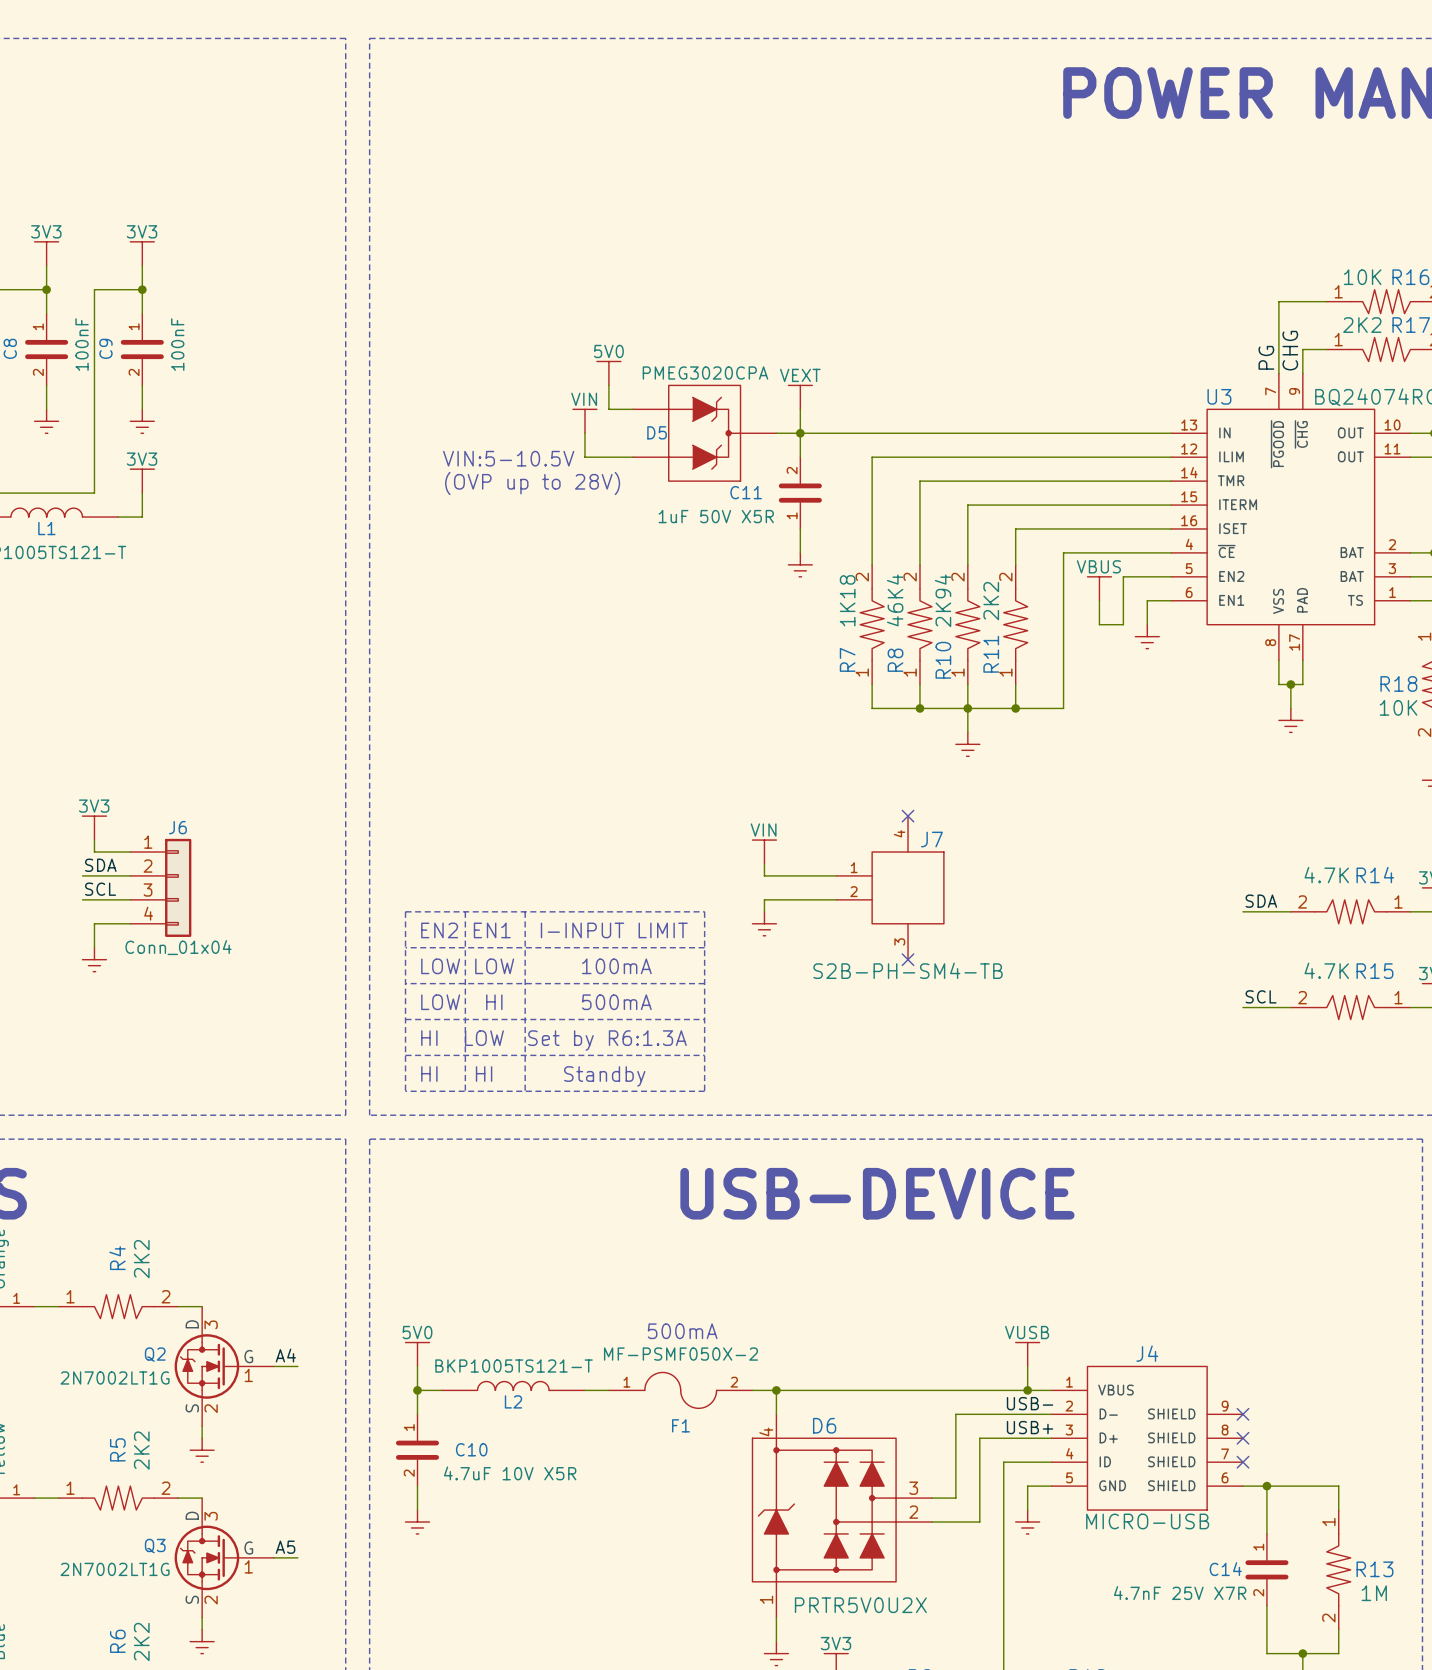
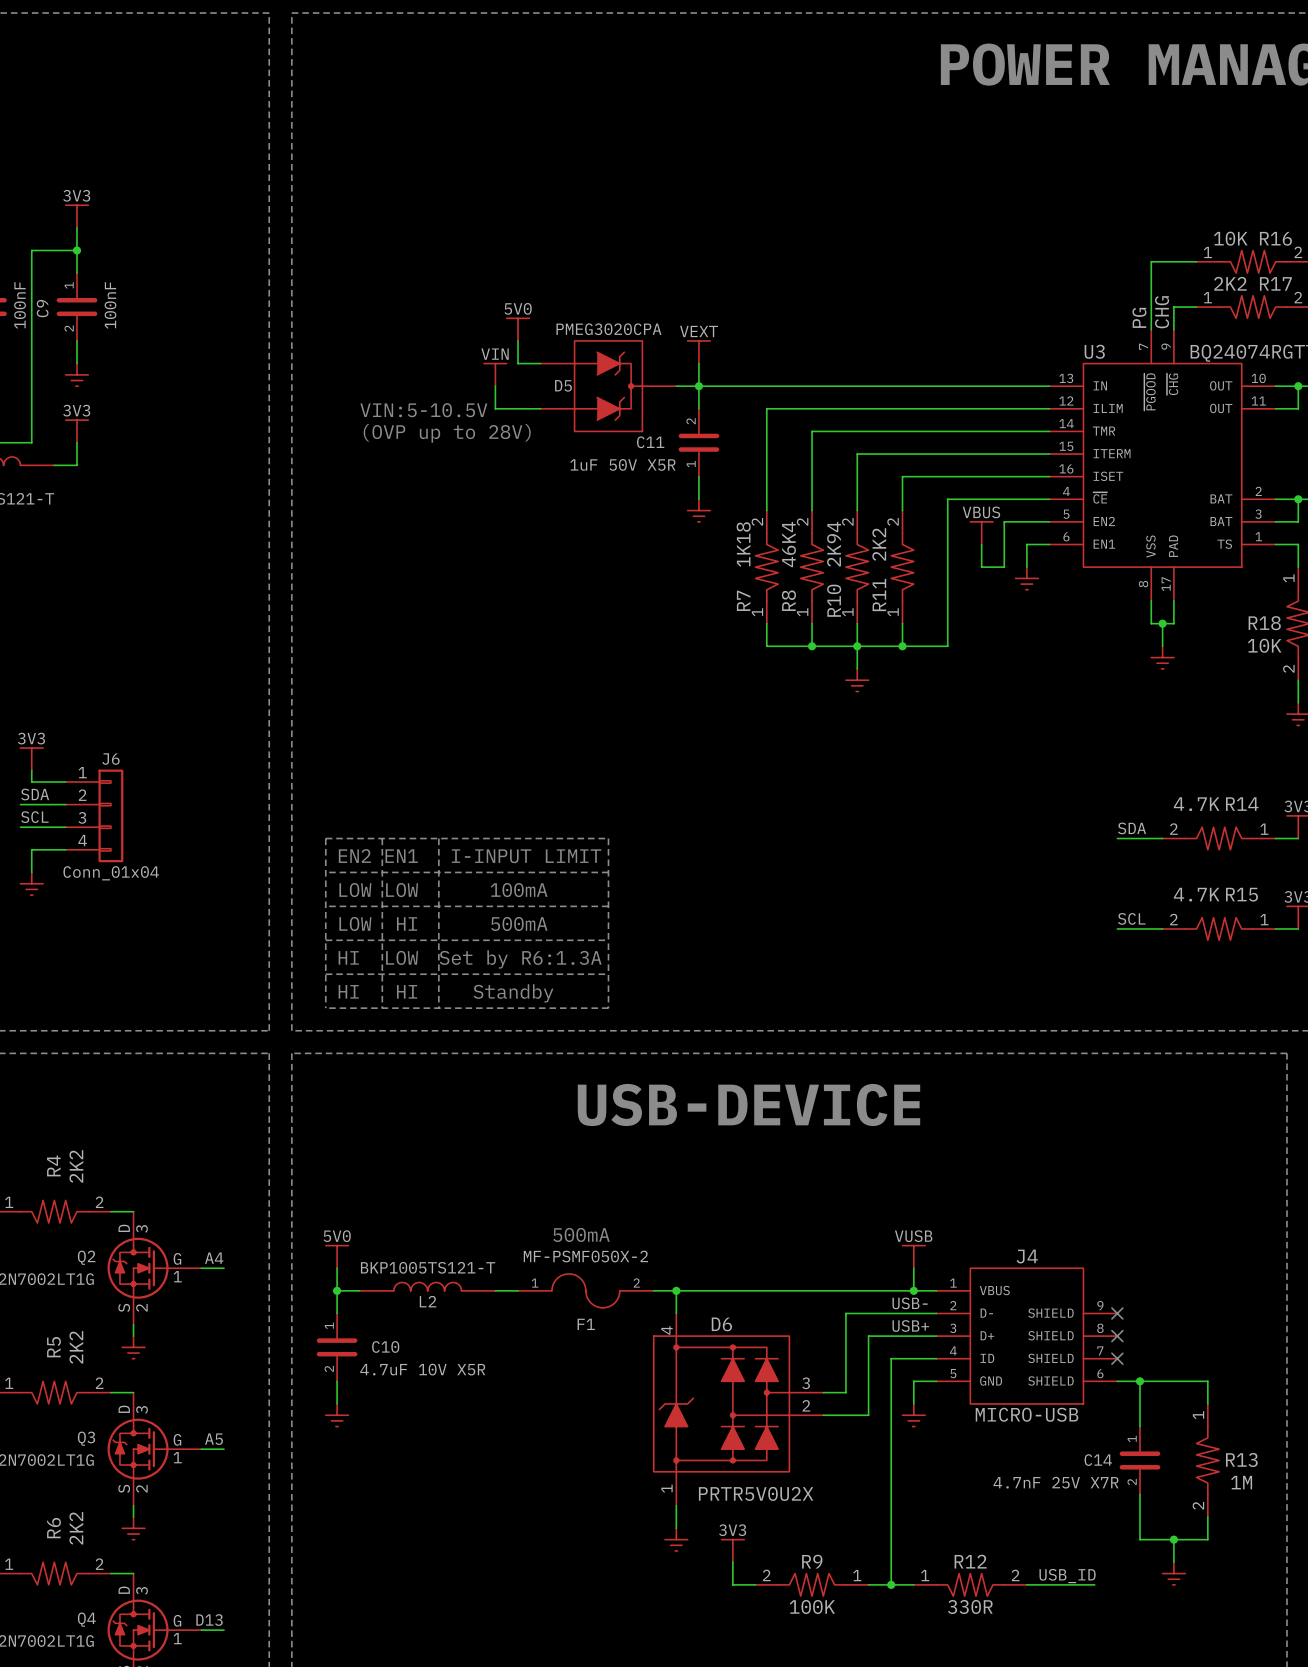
no-connect mark: (908, 816) -> none
power symbol: VIN (764, 852) -> none
wire: (764, 863) (764, 875) (836, 875) -> none
J7: S2B-PH-SM4-TB (890, 887) -> none
wire: (836, 899) (764, 899) (764, 911) -> none
power symbol: (764, 923) -> none
no-connect mark: (908, 959) -> none

